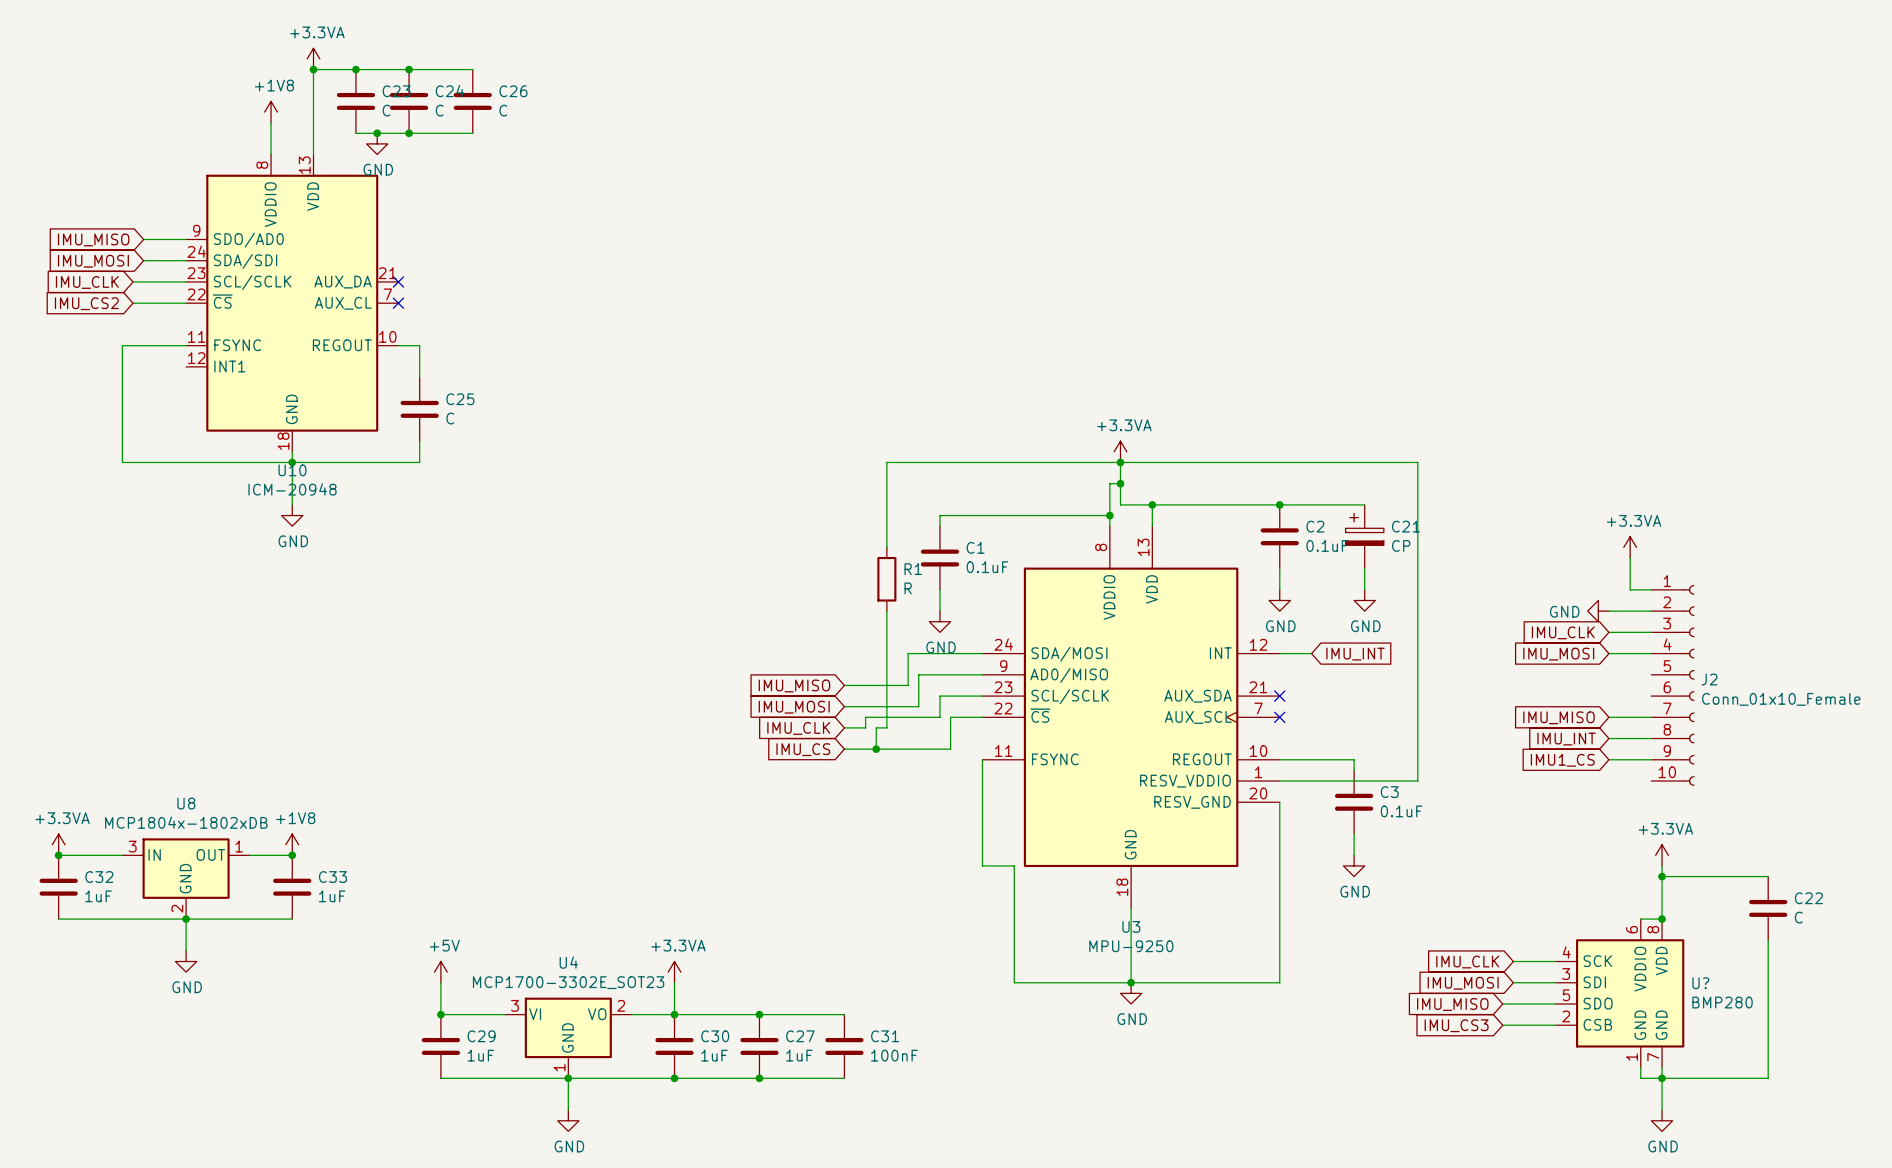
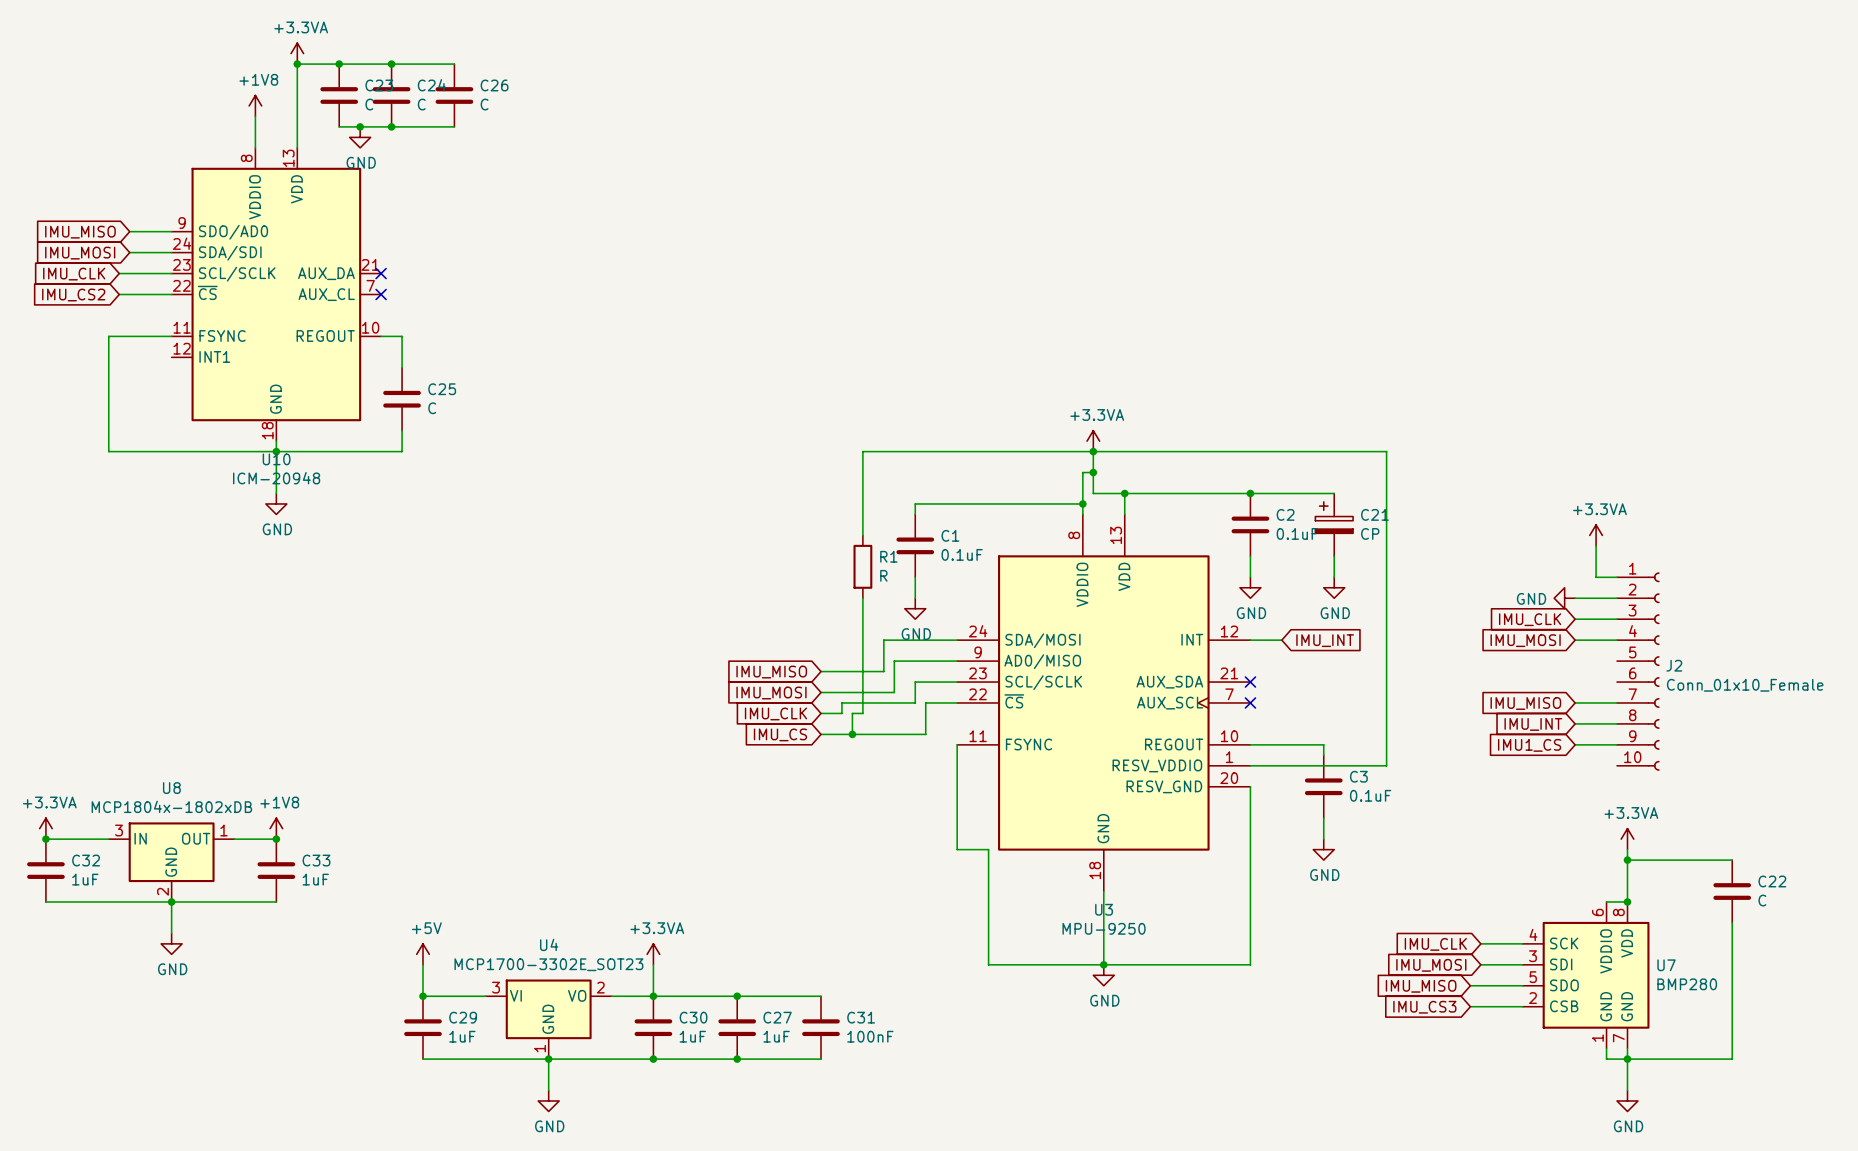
U? name: U? (1700, 983) -> U7 (1666, 965)

